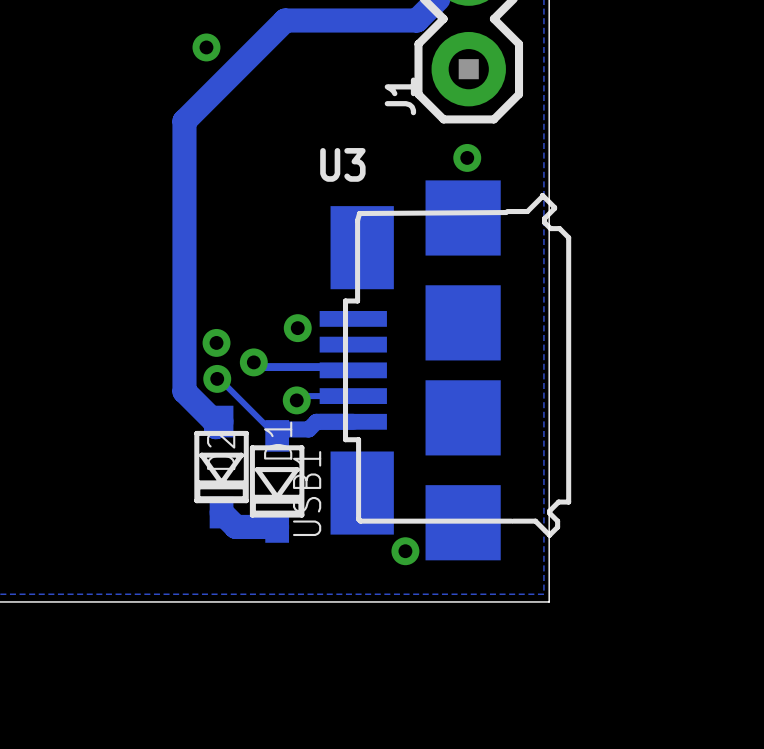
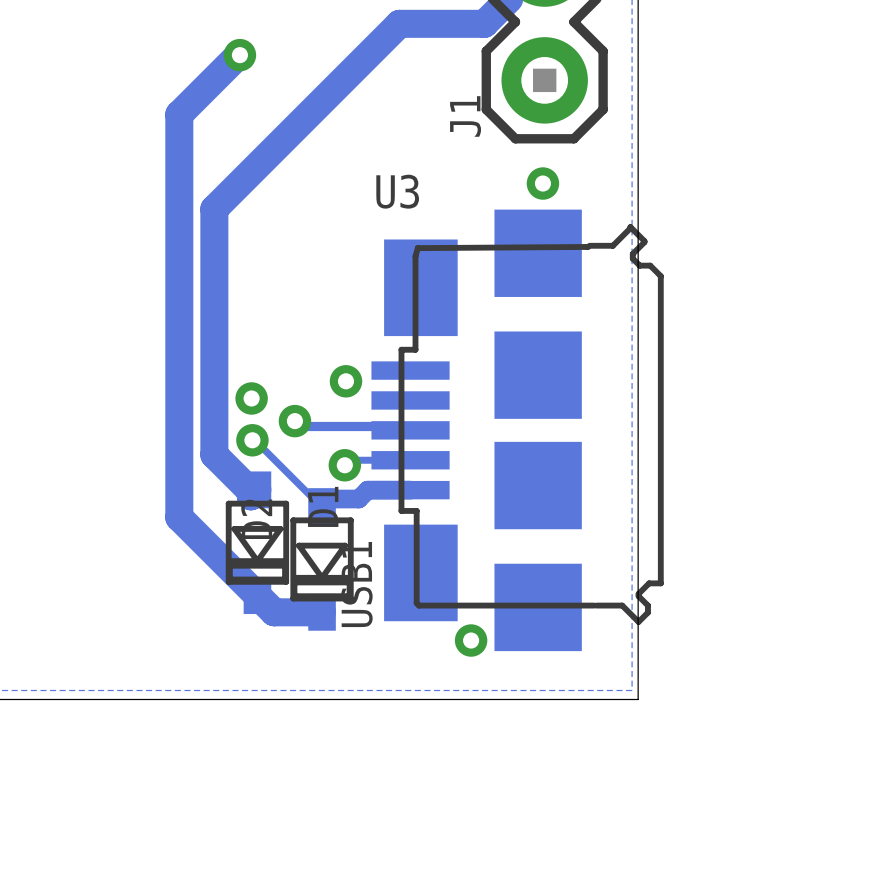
track: (343, 20) (285, 20) (184, 121) (184, 179) -> (399, 23) (214, 208)
track: none -> (239, 55) (179, 114) (179, 517) (257, 595)

